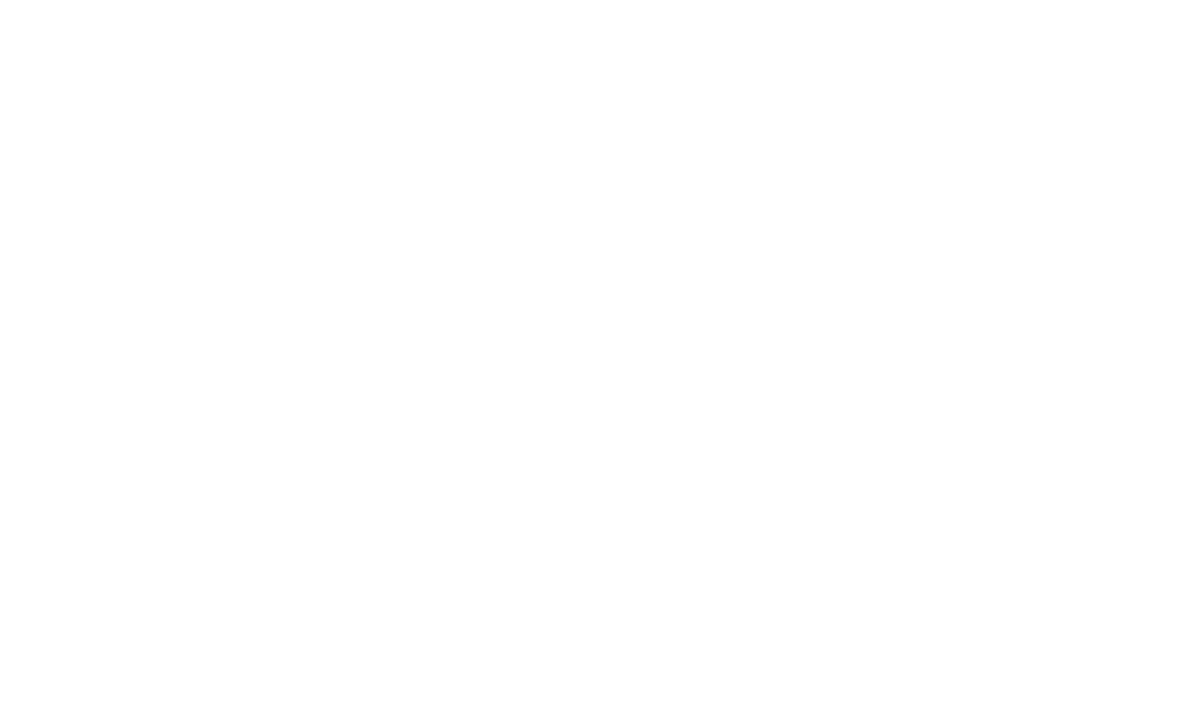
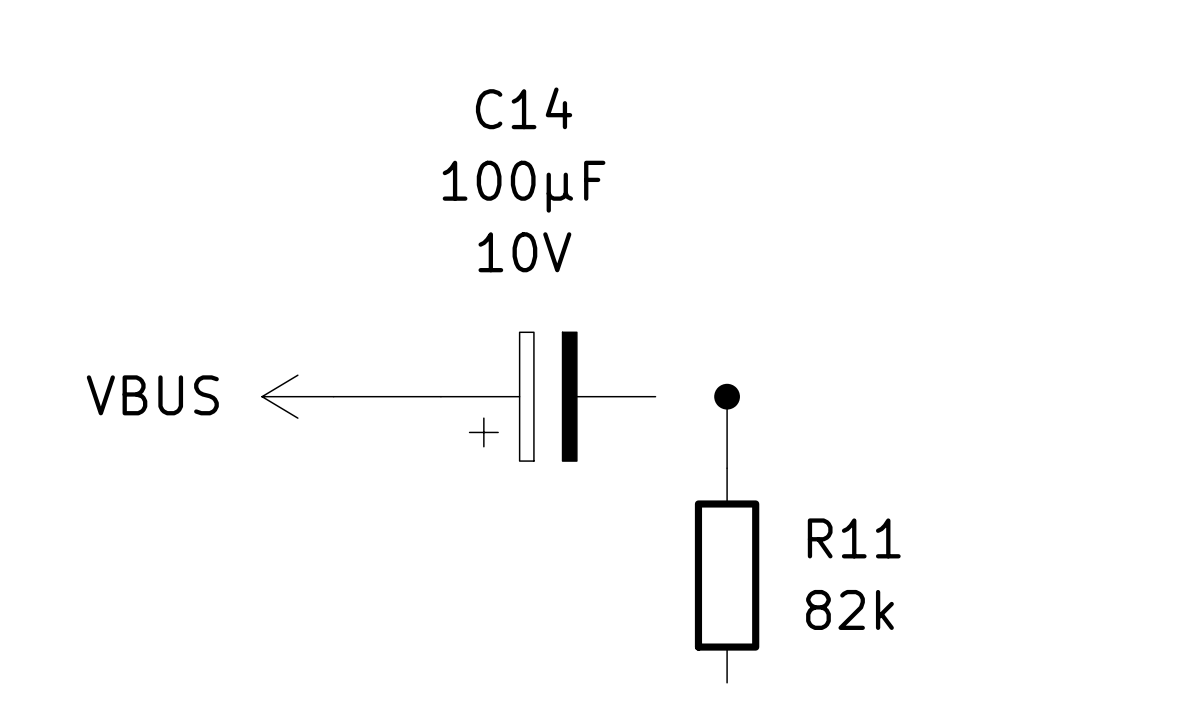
power symbol: none -> VBUS (297, 396)
wire: none -> (333, 396) (440, 396)
C14: none -> 100µF (548, 396)
wire: none -> (727, 396) (727, 468)
junction: none -> (727, 396)
R11: none -> 82k (727, 575)

